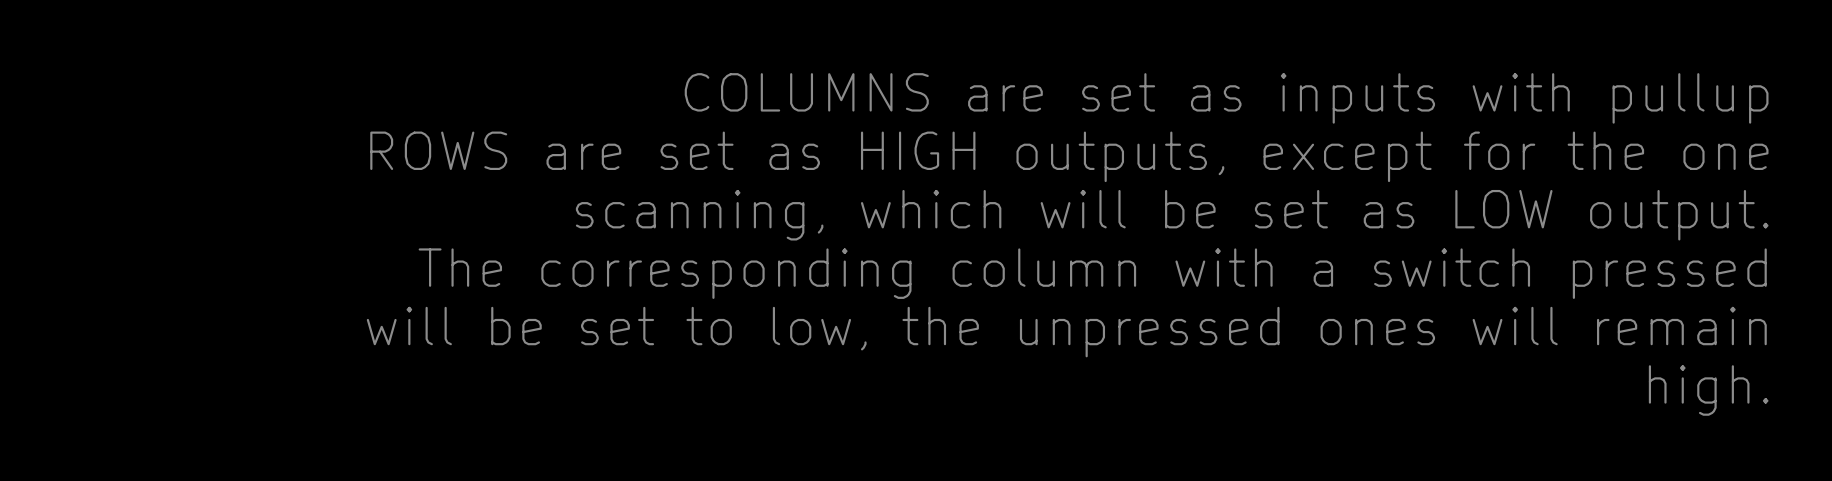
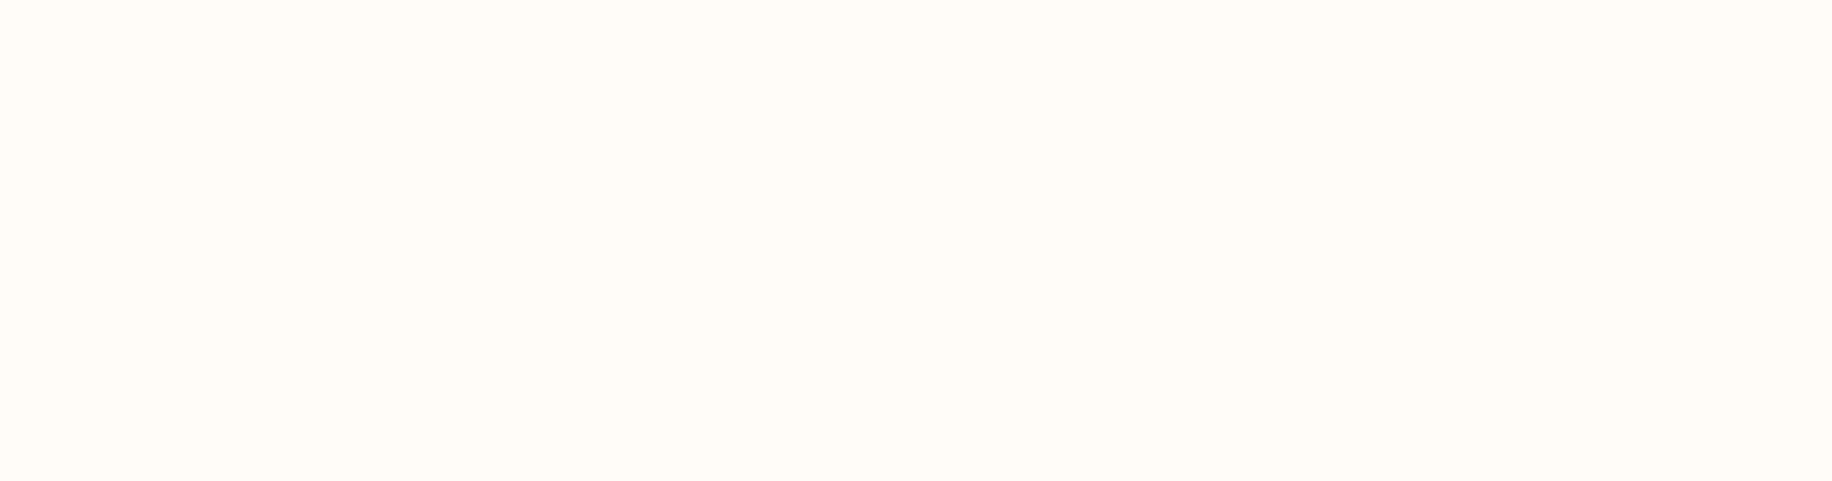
text: COLUMNS are set as inputs with pullup (1226, 98) -> none
text: ROWS are set as HIGH outputs, except for the one (1069, 156) -> none
text: scanning, which will be set as LOW output. (1172, 215) -> none
text: The corresponding column with a switch pressed (1092, 273) -> none
text: will be set to low, the unpressed ones will remain (1066, 332) -> none
text: high. (1708, 390) -> none

